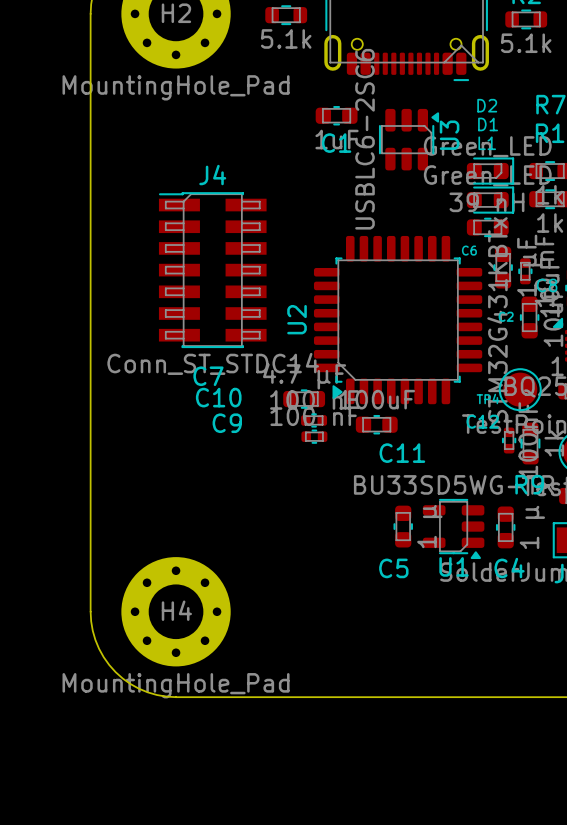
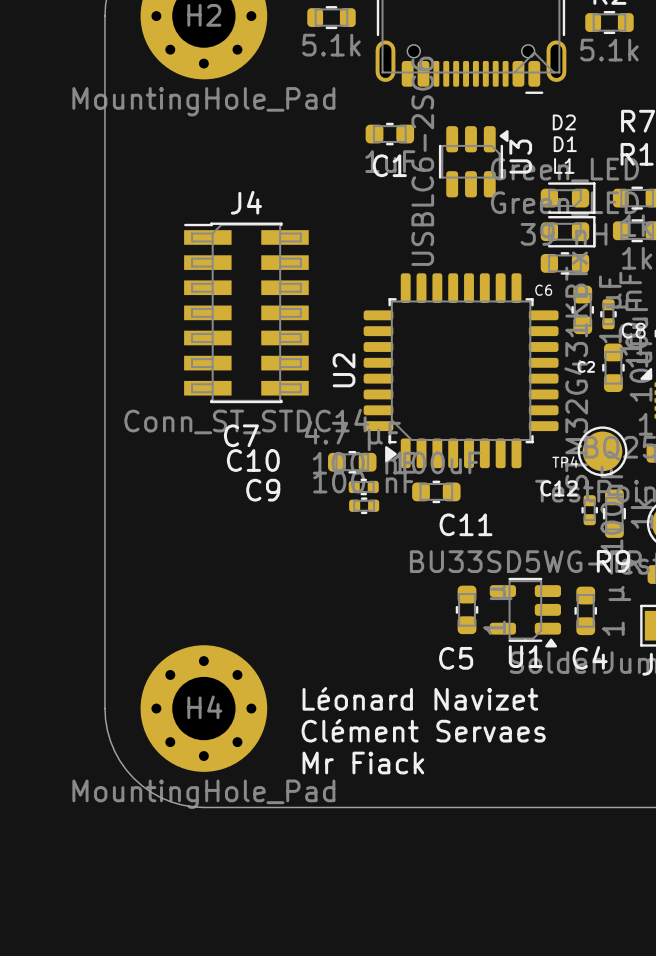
text: none -> Léonard Navizet (420, 698)
text: none -> Clément Servaes (423, 730)
text: none -> Mr Fiack (363, 763)

